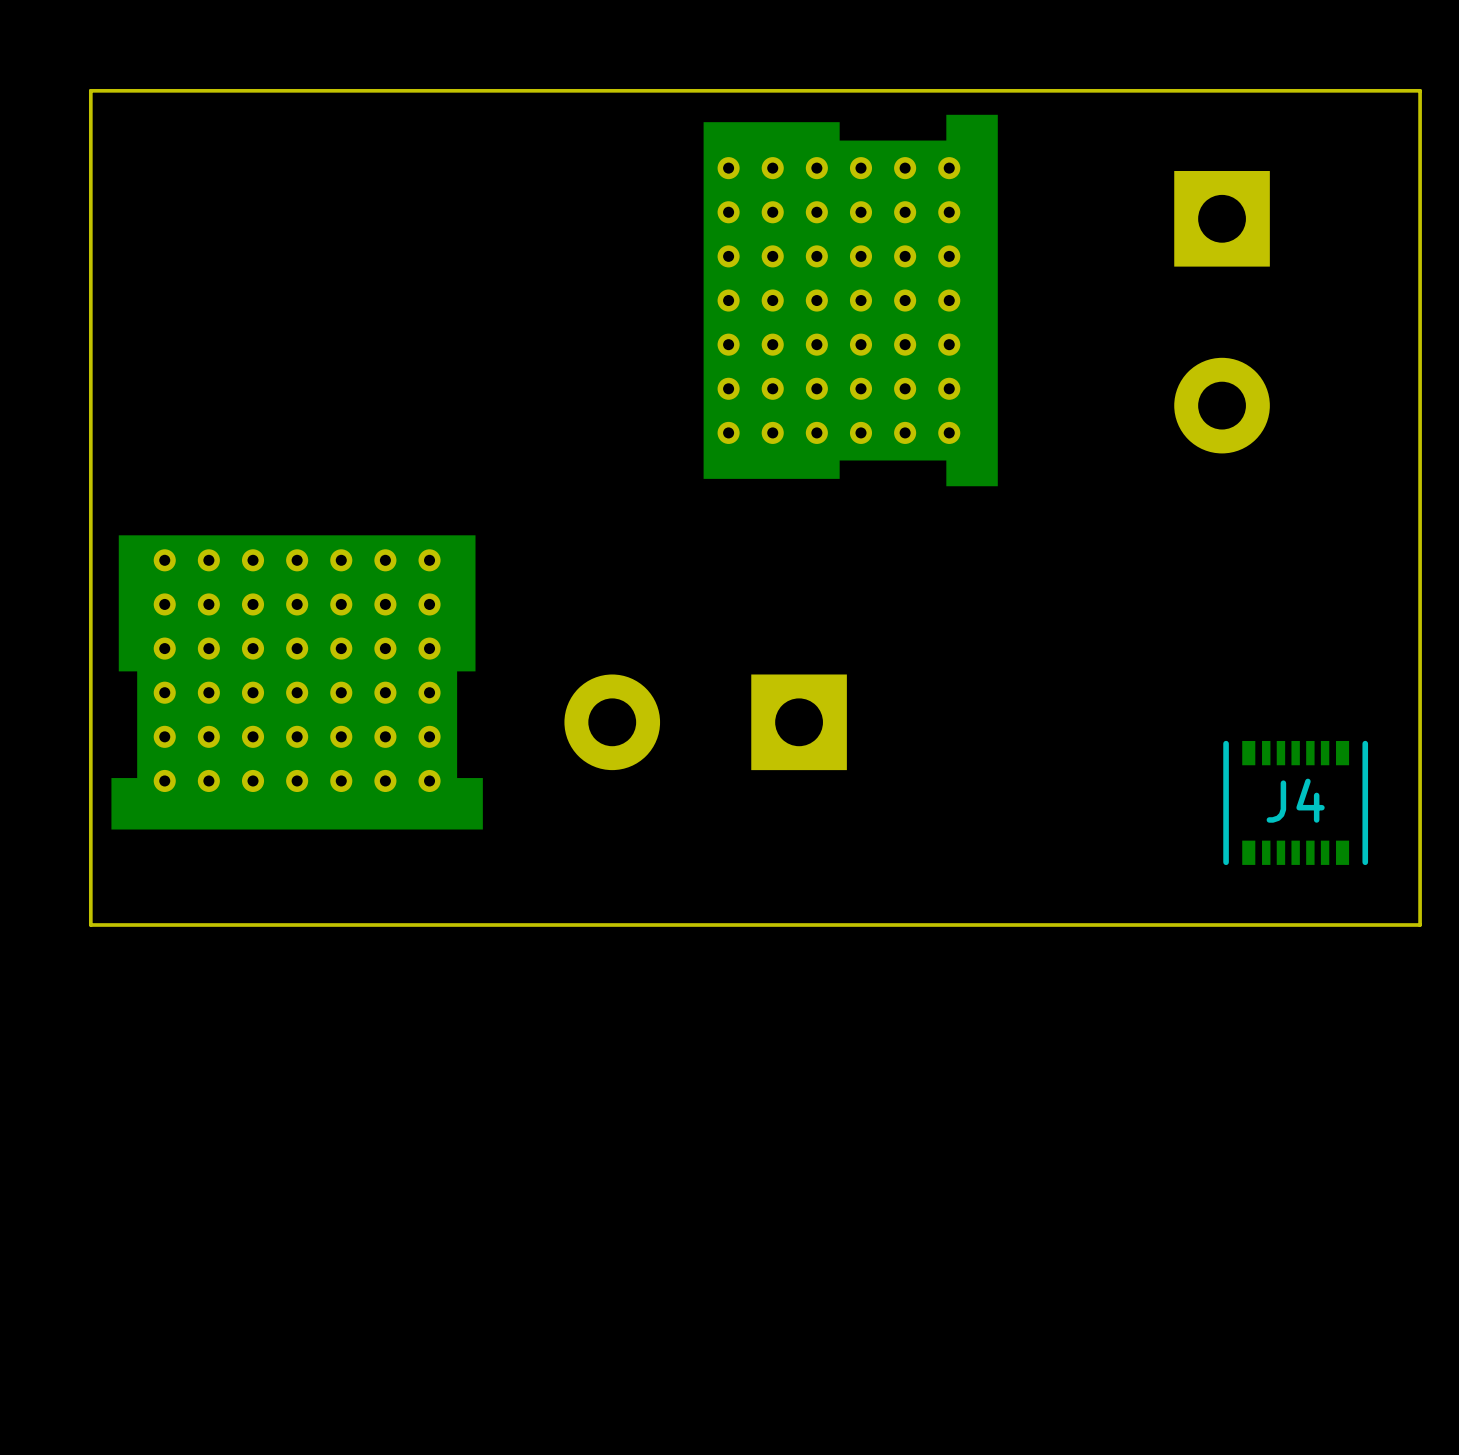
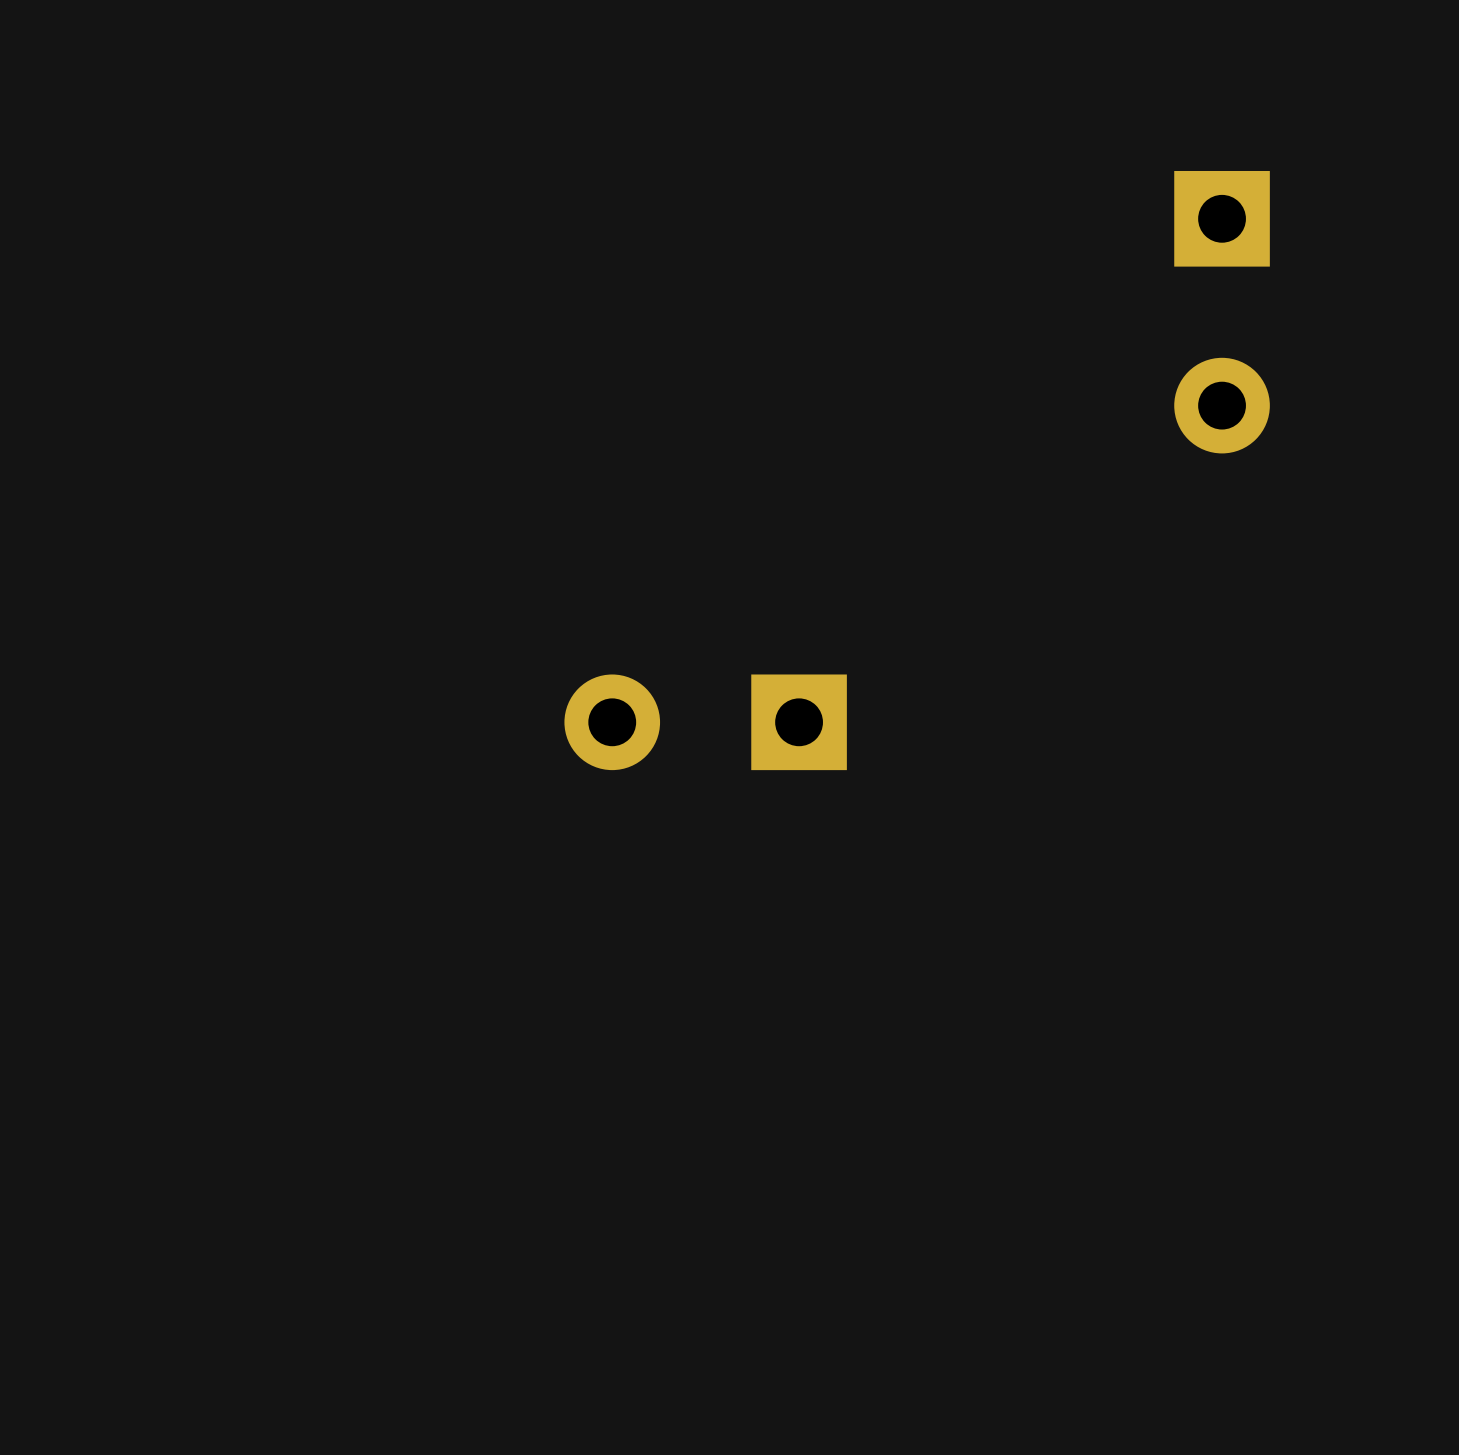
board edge: (1420, 90) (90, 90) (90, 924) (1420, 924) (1420, 90) -> none
part: (850, 300) -> none
part: (297, 682) -> none
J4: (1295, 802) -> none

